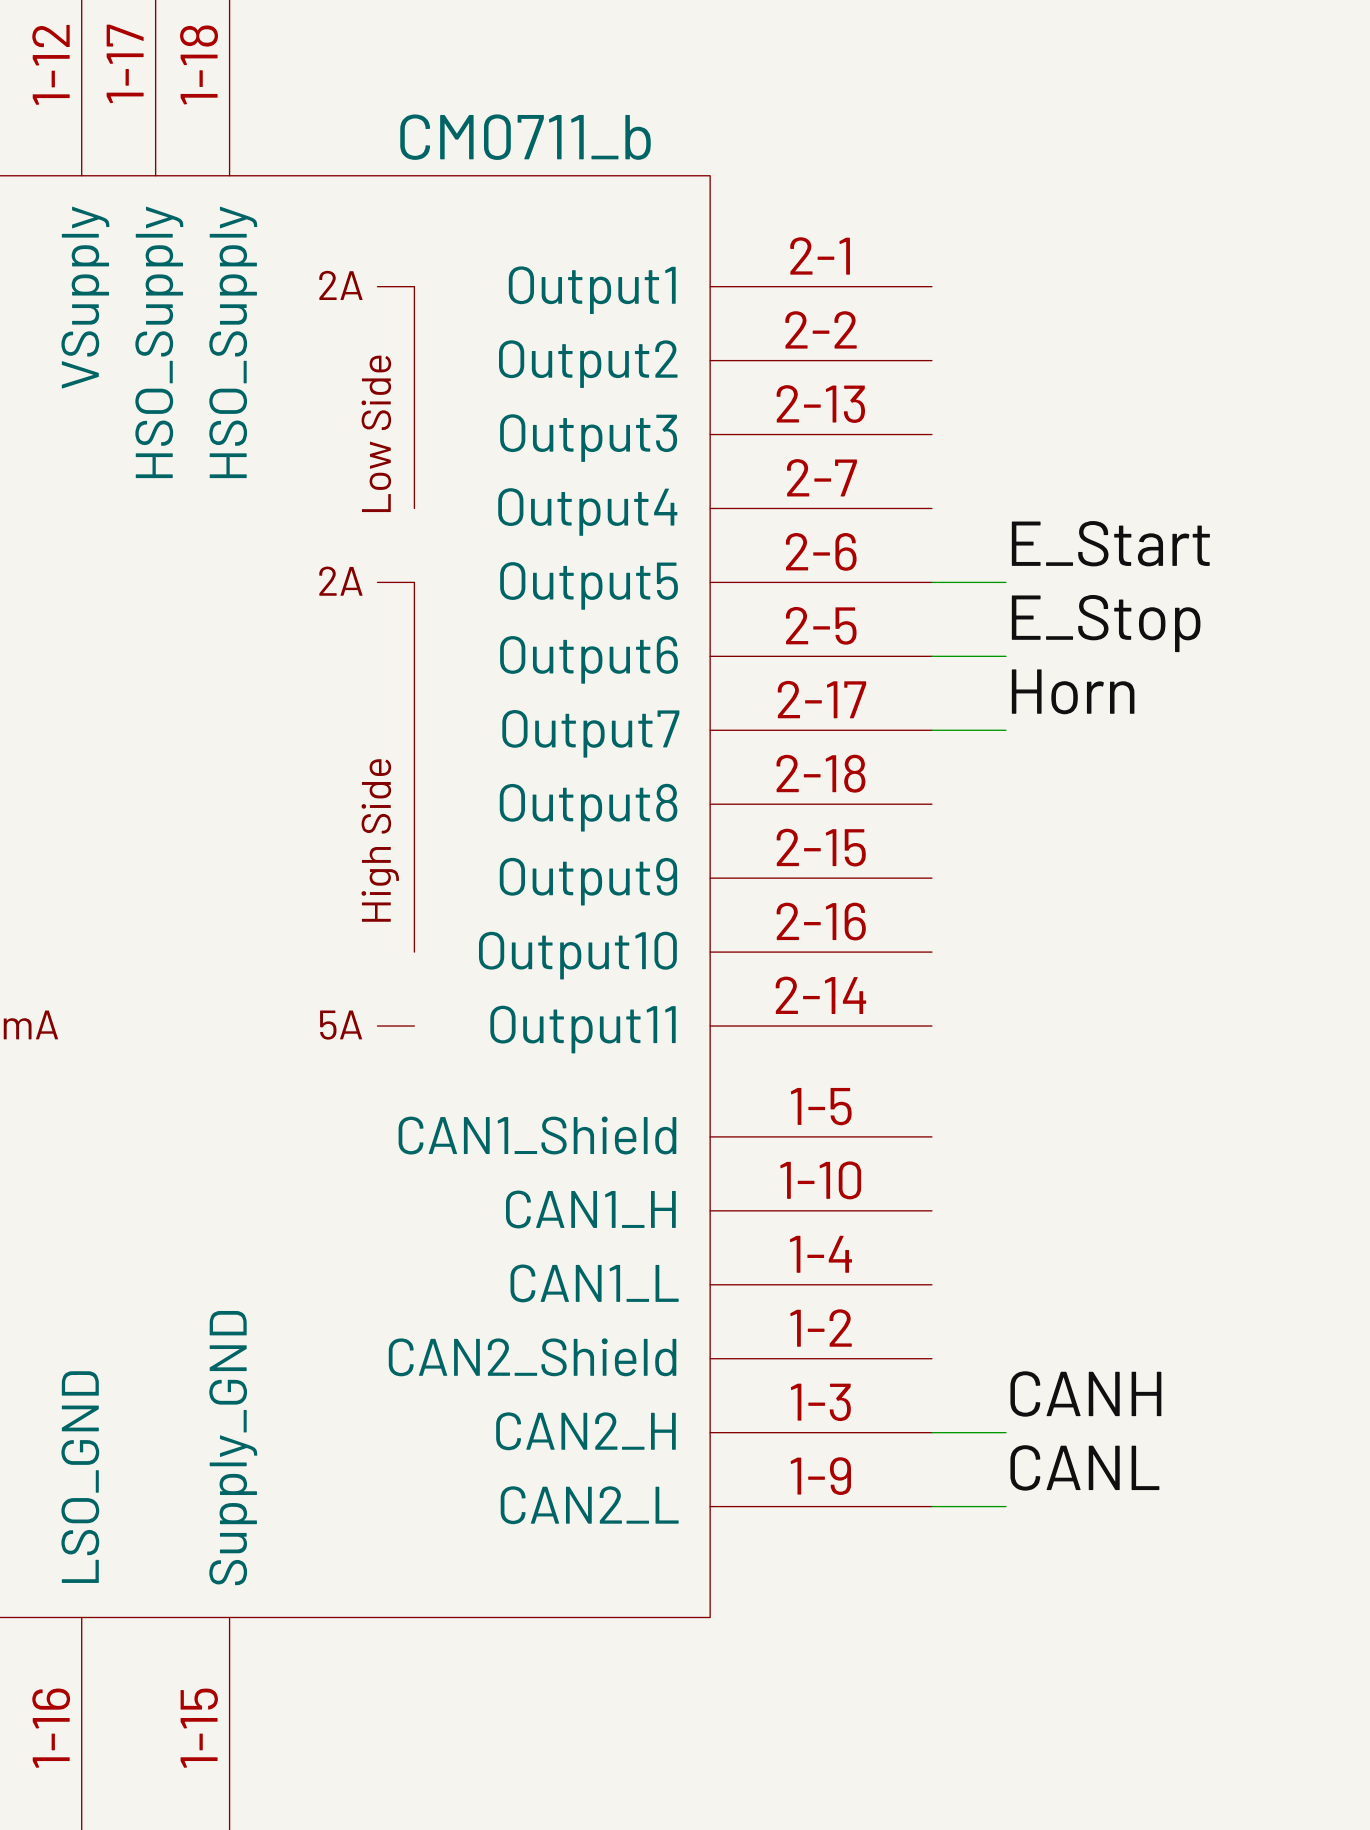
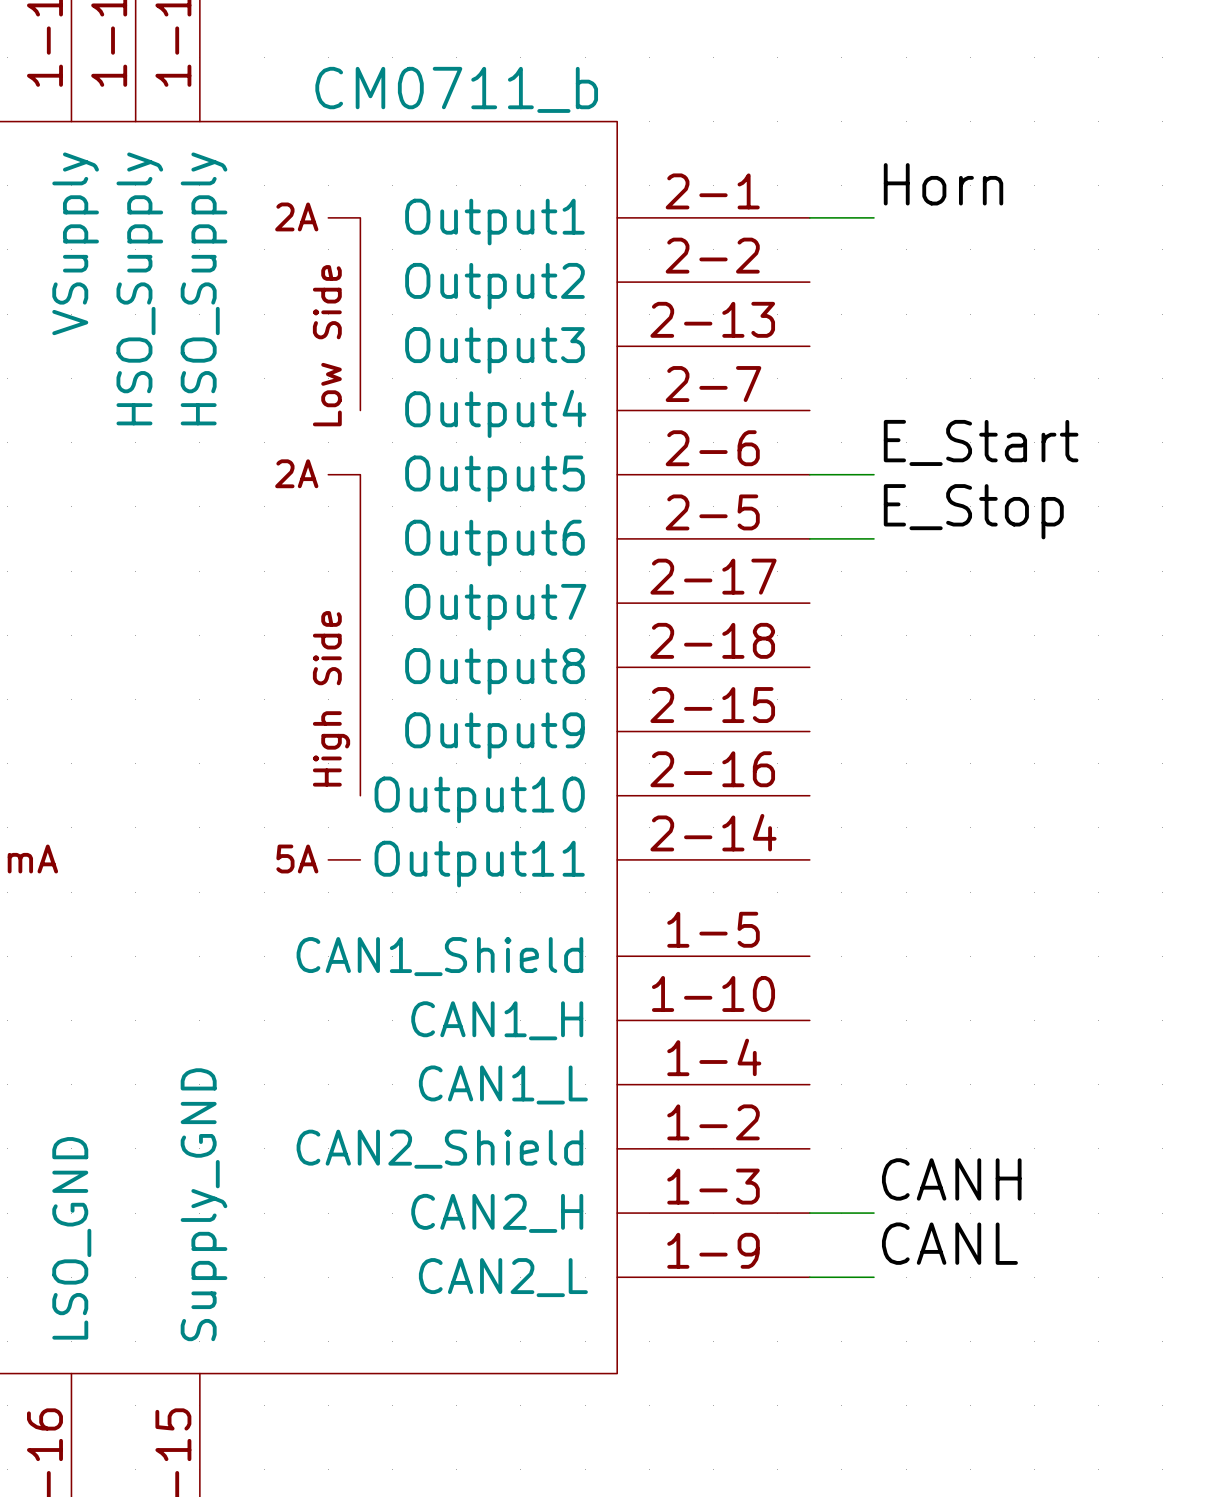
label position: Horn (1073, 691) -> Horn (943, 184)
wire: (931, 730) (1005, 730) -> (809, 217) (874, 217)

